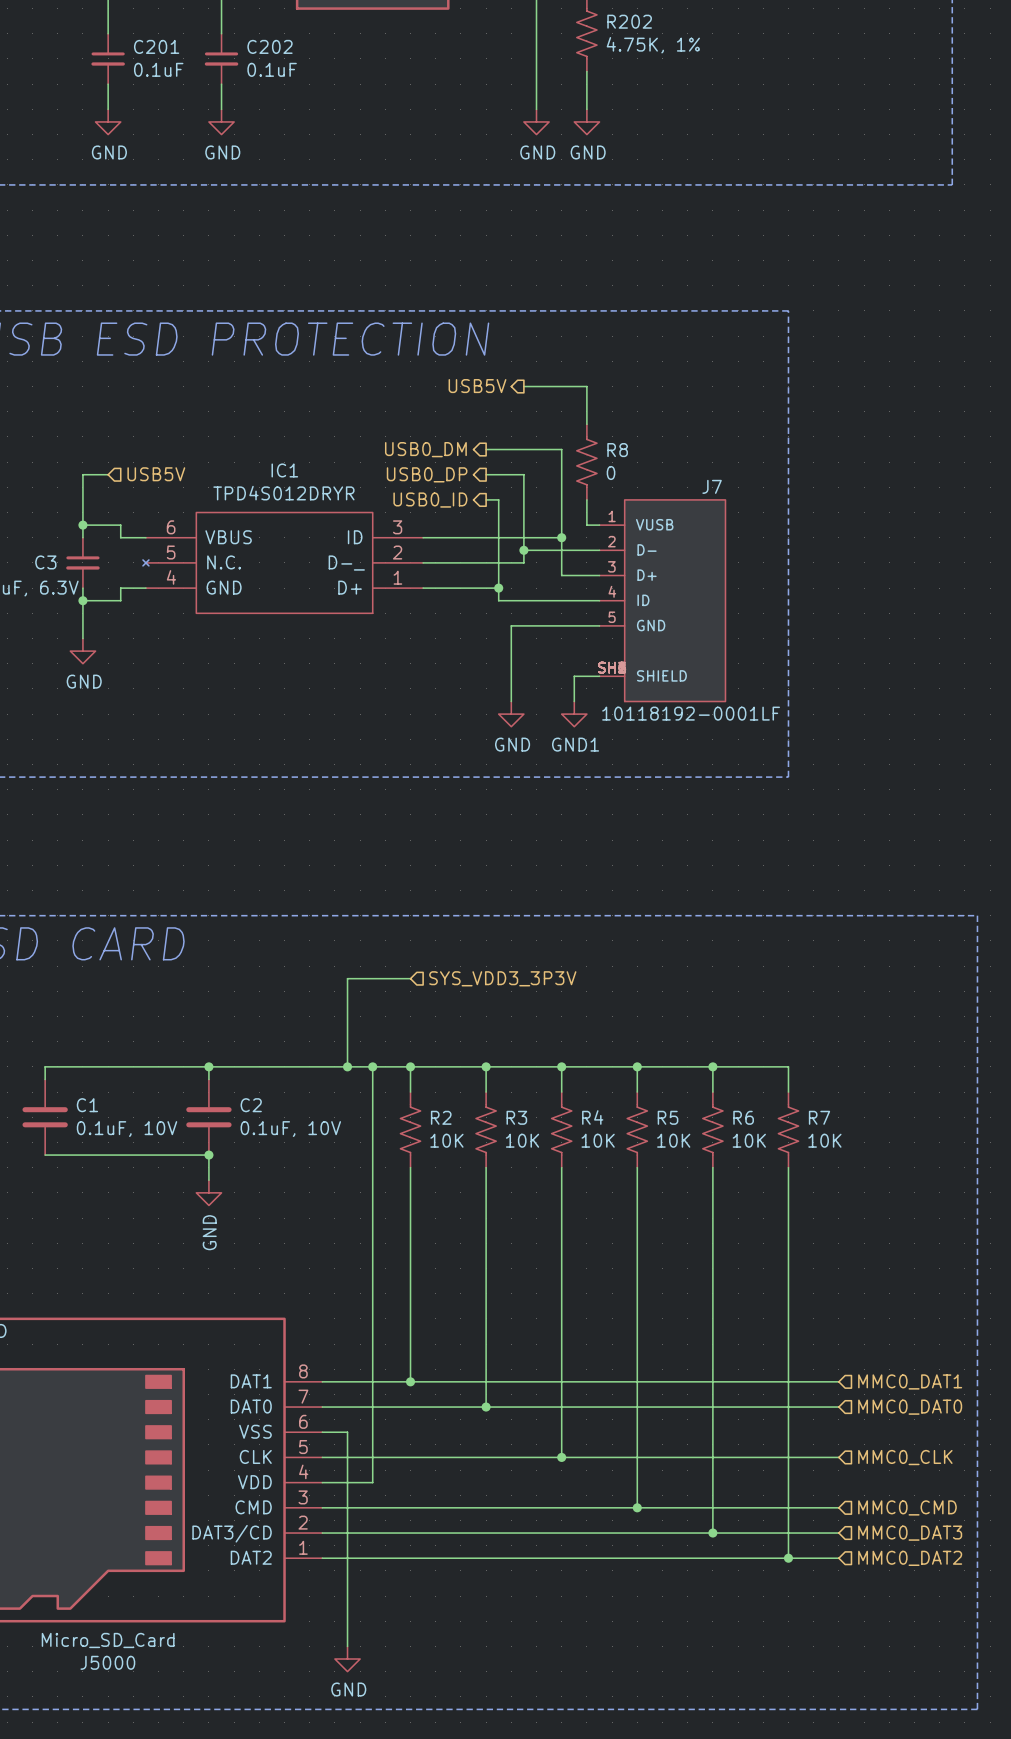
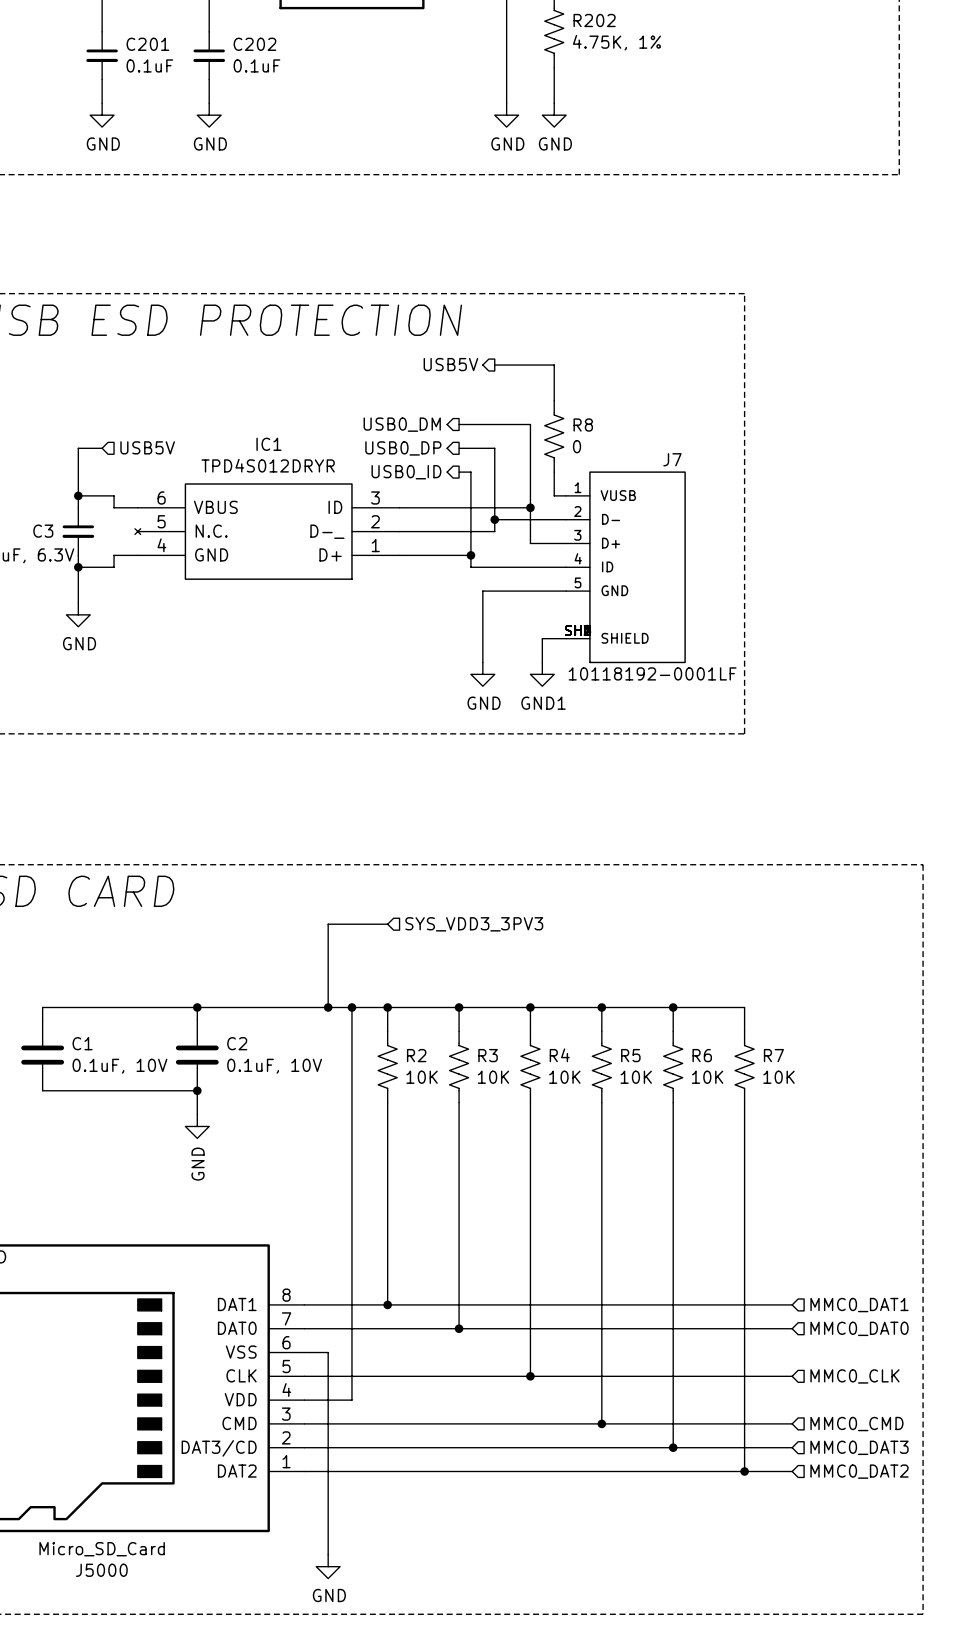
hierarchical label: SYS_VDD3_3P3V (502, 978) -> SYS_VDD3_3PV3 (474, 924)

